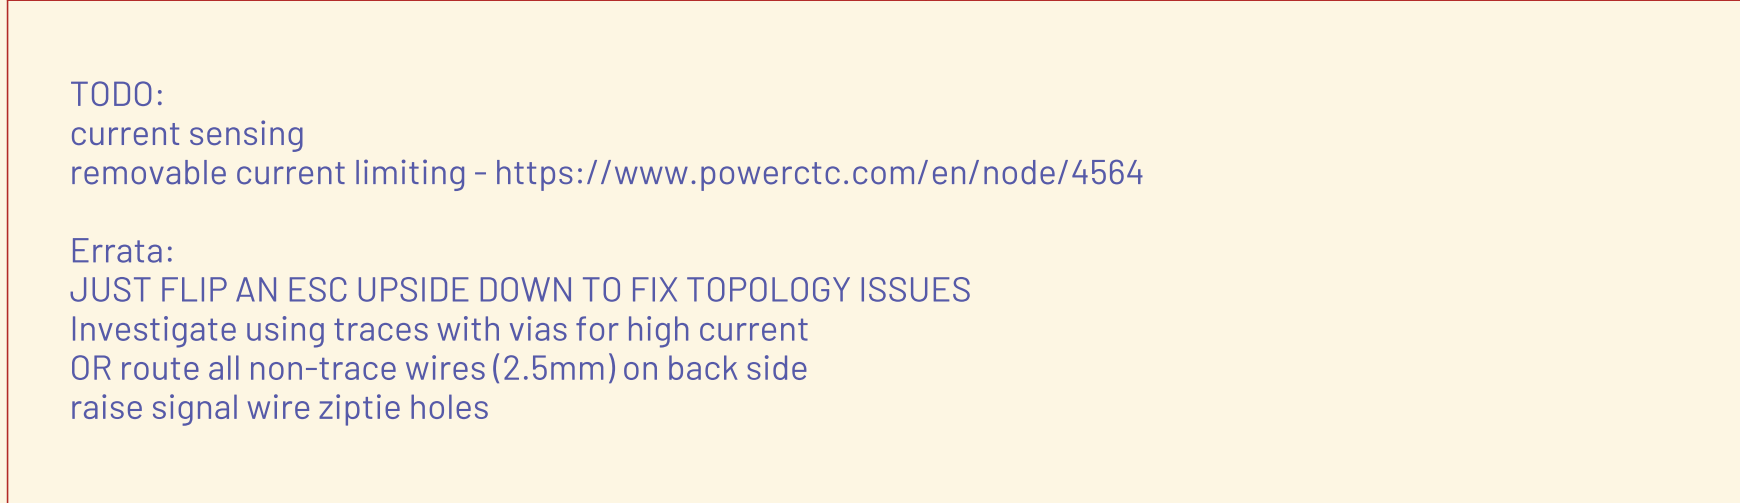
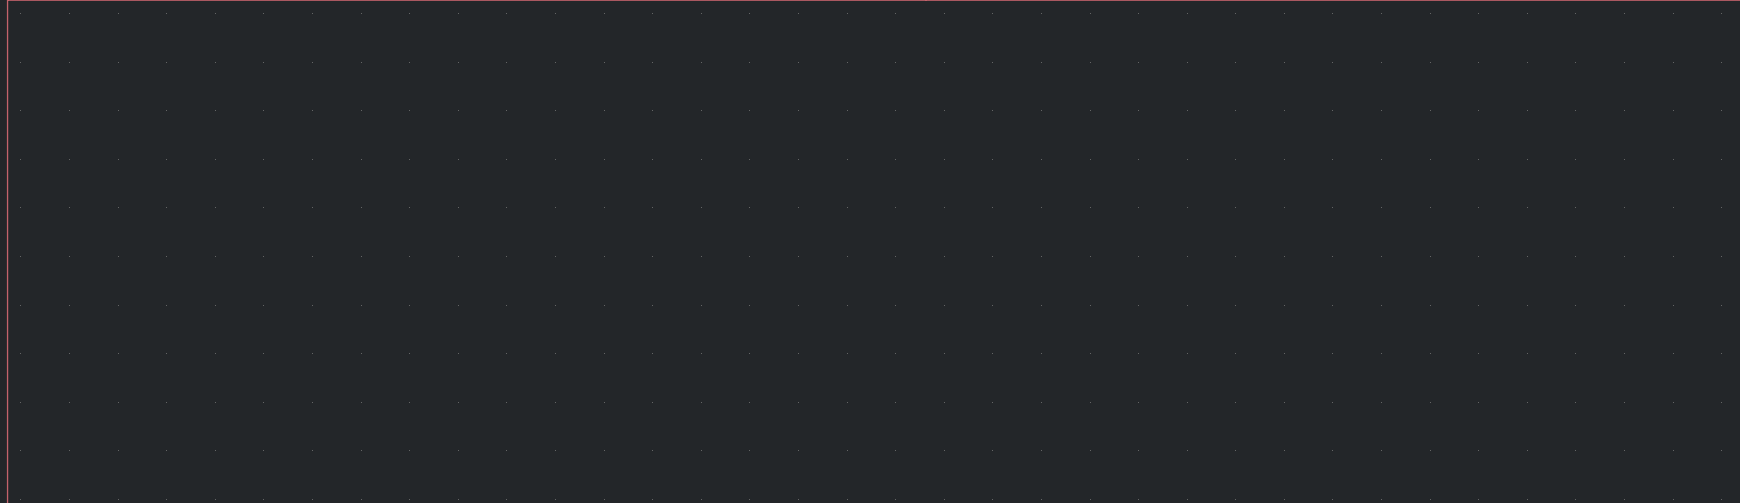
text: TODO: (116, 93) -> none
text: current sensing (187, 136) -> none
text: removable current limiting - https://www.powerctc.com/en/node/4564 (607, 175) -> none
text: Errata: (122, 250) -> none
text: JUST FLIP AN ESC UPSIDE DOWN TO FIX TOPOLOGY ISSUES (520, 289) -> none
text: Investigate using traces with vias for high current (440, 331) -> none
text: OR route all non-trace wires (2.5mm) on back side (439, 368) -> none
text: raise signal wire ziptie holes (280, 410) -> none

